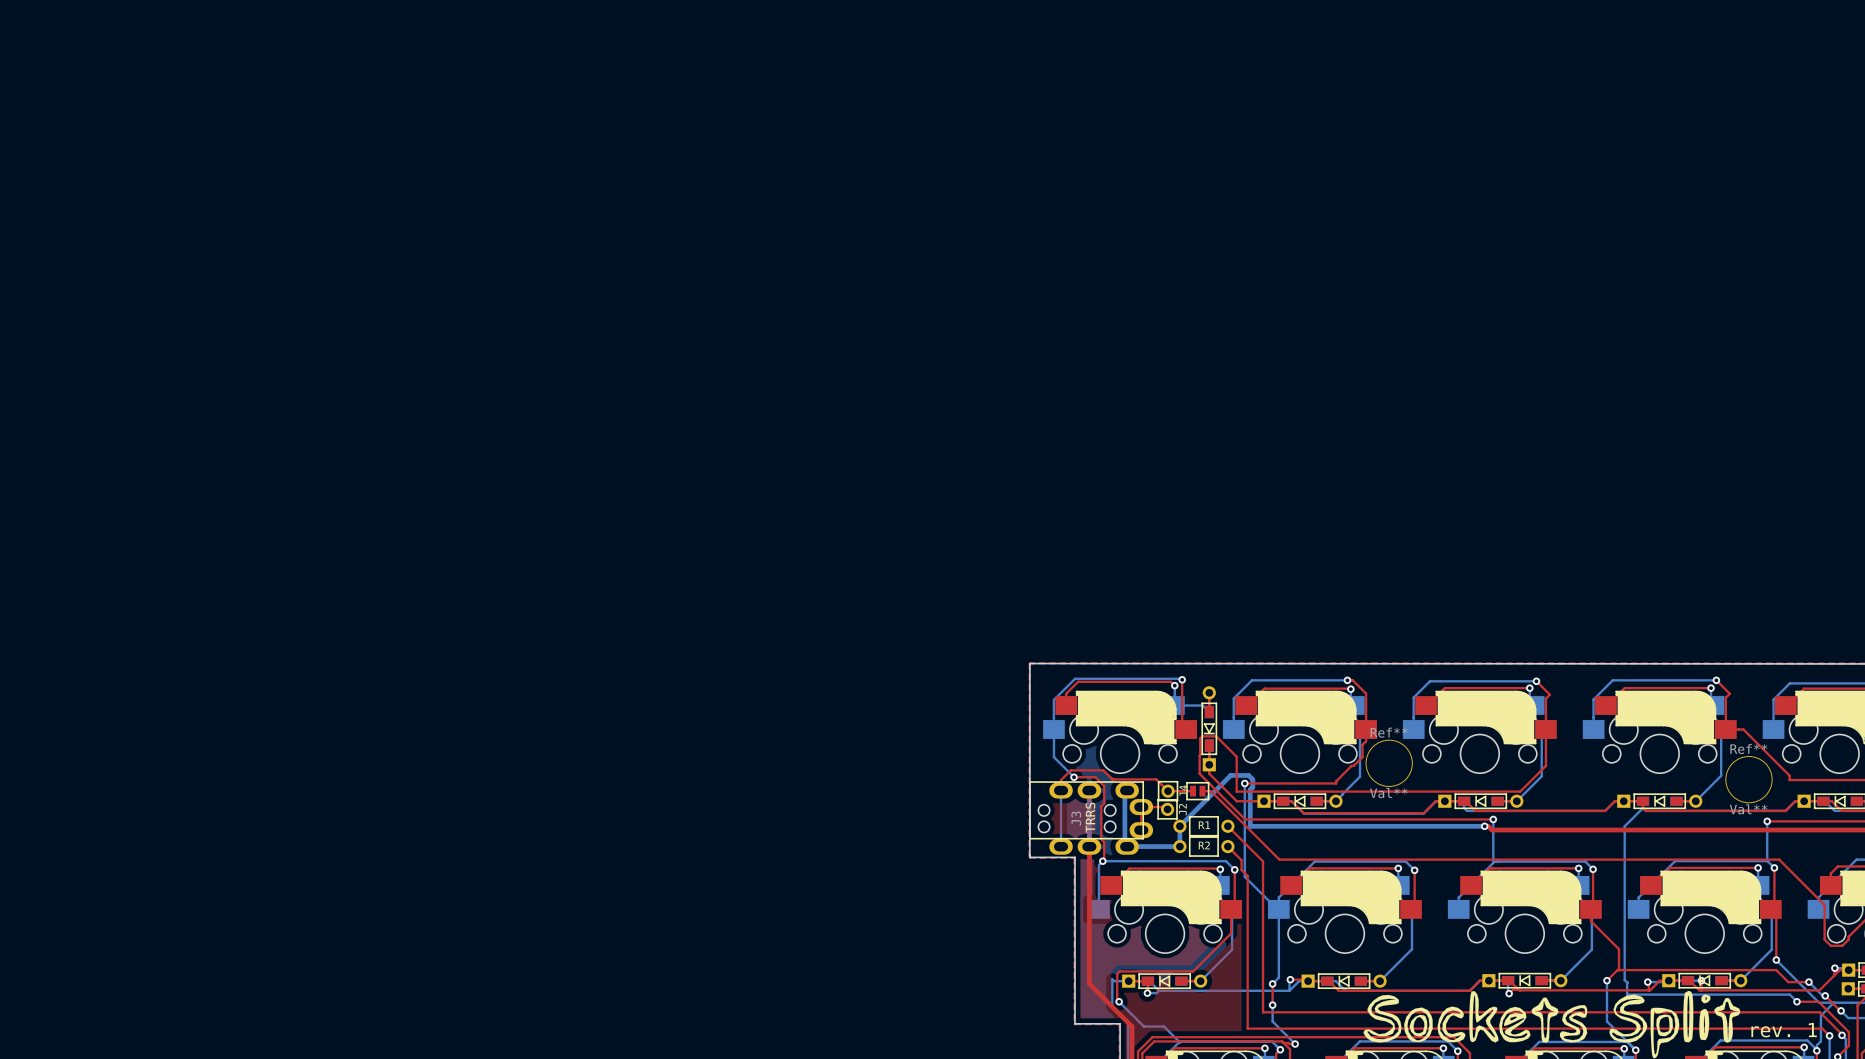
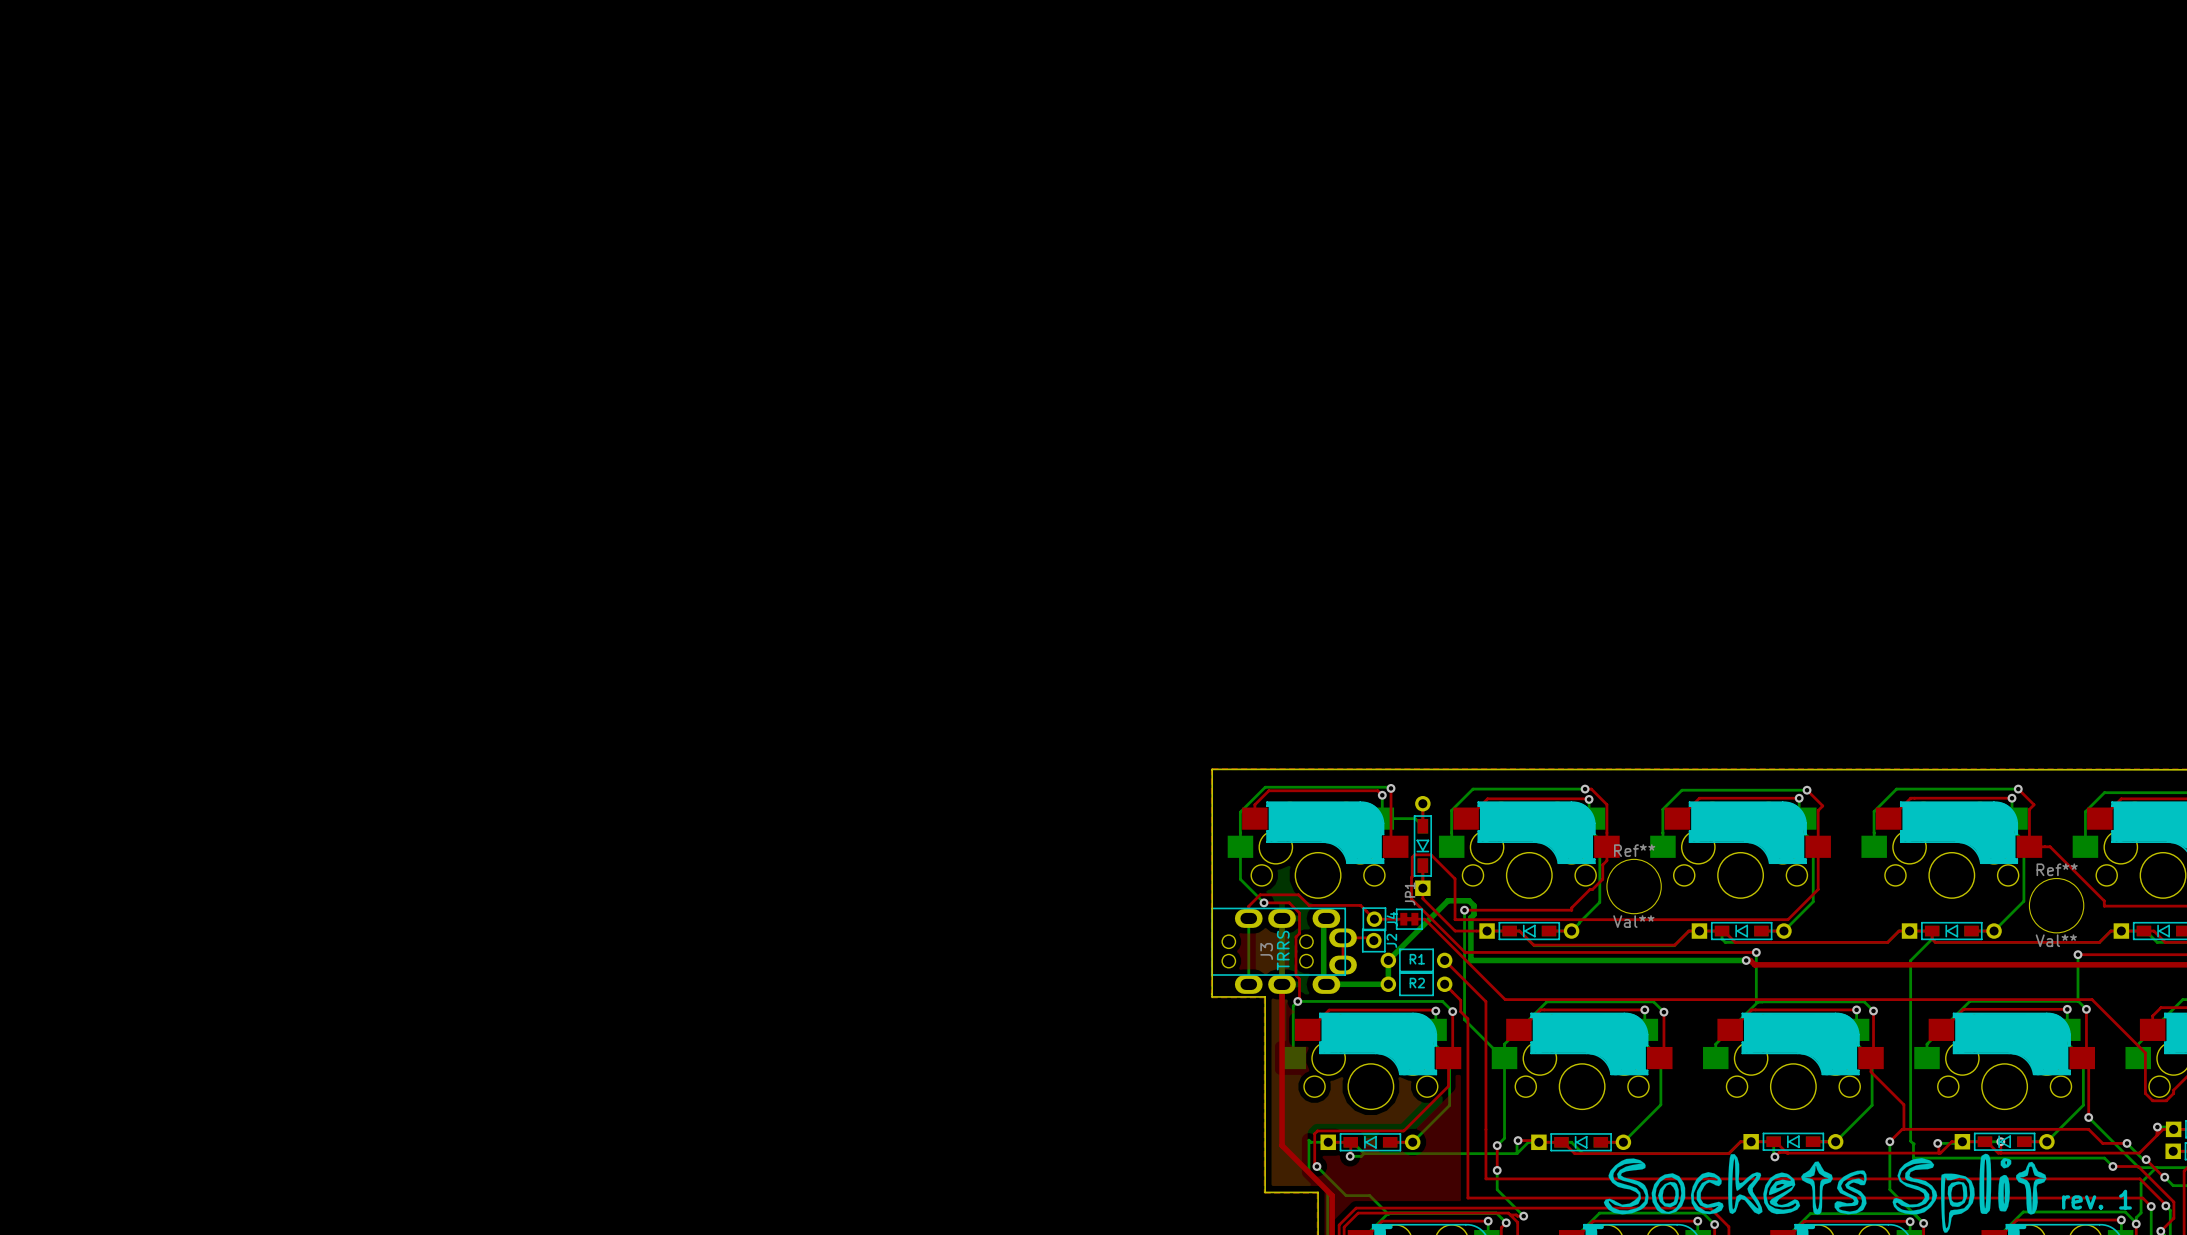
part: (1197, 791) -> none
JP1: none -> (1409, 919)

